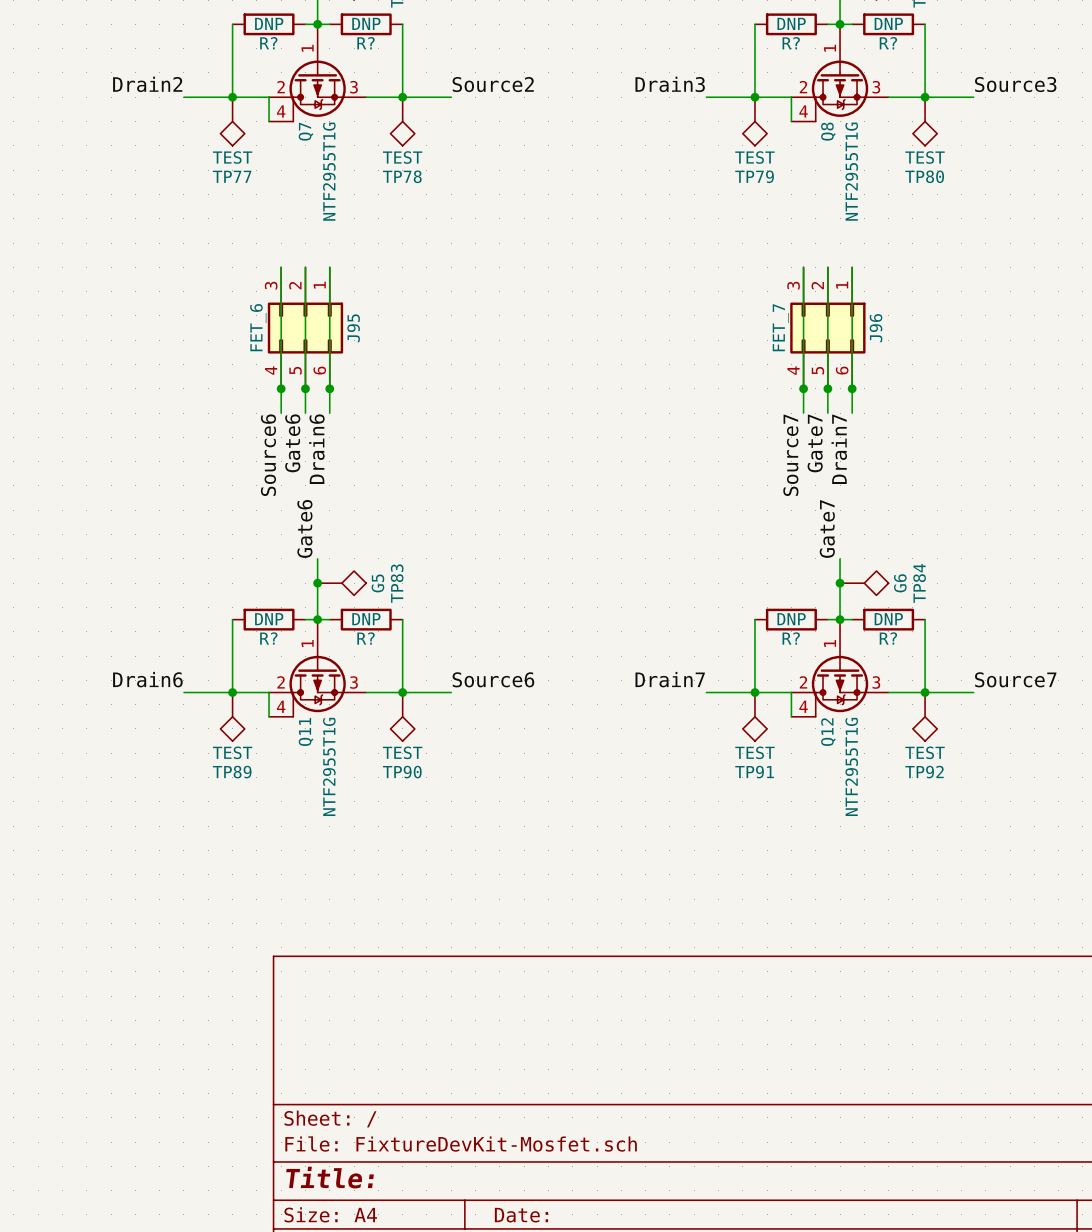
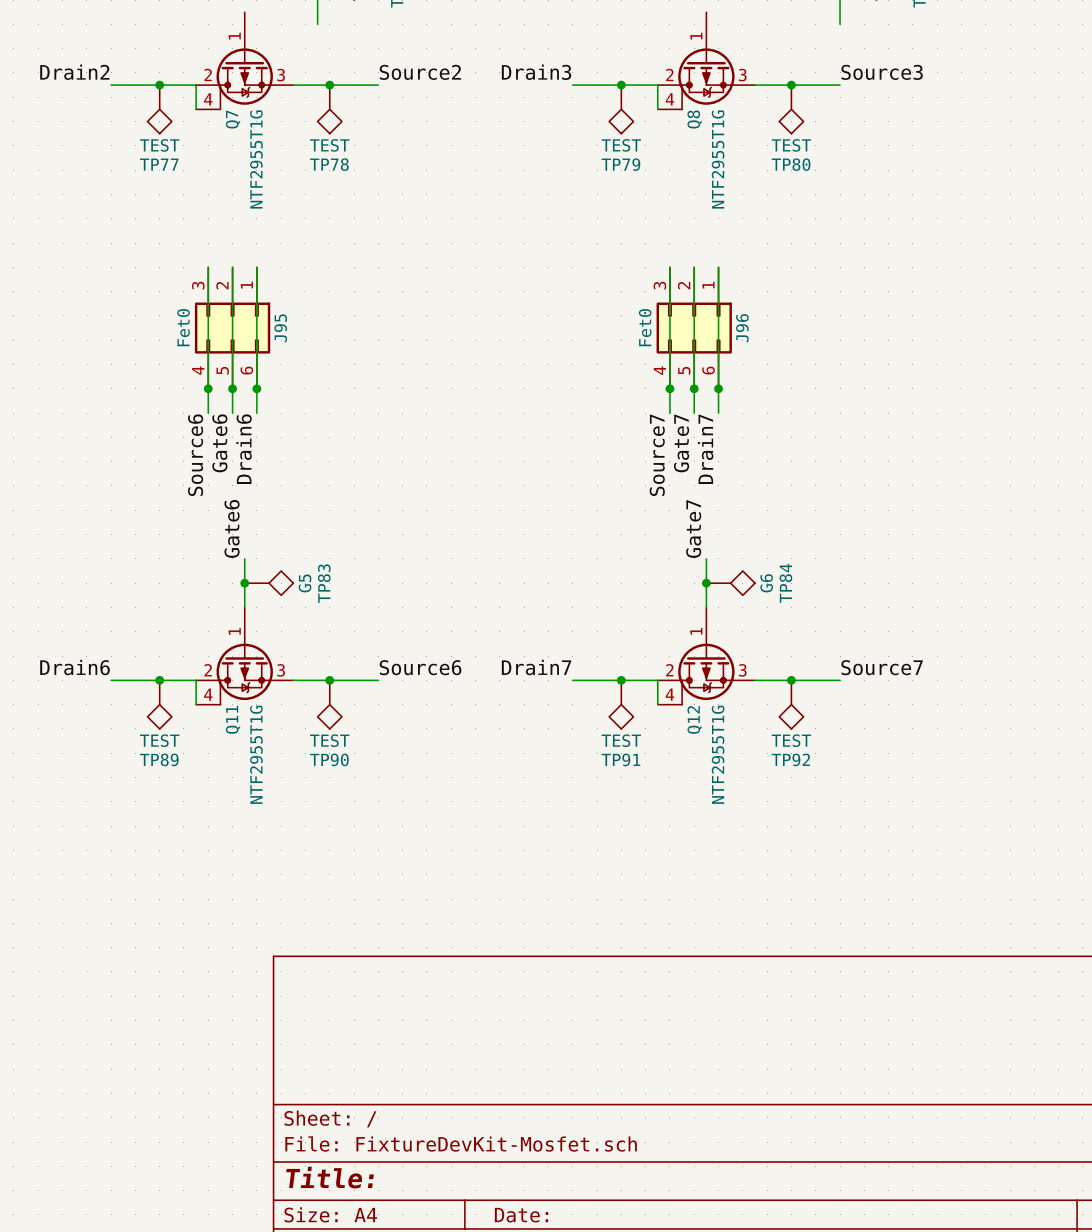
wire: (232, 24) (232, 97) -> none
R?: DNP (269, 24) -> none
wire: (305, 24) (329, 24) -> none
junction: (317, 24) -> none
R?: DNP (366, 24) -> none
wire: (402, 24) (402, 97) -> none
wire: (754, 24) (754, 97) -> none
R?: DNP (791, 24) -> none
wire: (827, 24) (852, 24) -> none
junction: (840, 24) -> none
R?: DNP (888, 24) -> none
wire: (925, 24) (925, 97) -> none
Q7 position: (317, 72) -> (244, 60)
Q8 position: (840, 72) -> (706, 60)
label position: Drain2 (147, 84) -> Drain2 (74, 72)
label position: Source2 (493, 84) -> Source2 (420, 72)
label position: Drain3 (670, 84) -> Drain3 (536, 72)
label position: Source3 (1015, 84) -> Source3 (882, 72)
junction: none -> (159, 85)
junction: none -> (329, 85)
junction: none -> (621, 85)
wire: (183, 97) (269, 97) (269, 121) -> (111, 85) (196, 85) (196, 109)
junction: (232, 97) -> none
wire: (366, 97) (451, 97) -> (293, 85) (378, 85)
junction: (402, 97) -> none
wire: (706, 97) (791, 97) (791, 121) -> (572, 85) (657, 85) (657, 109)
junction position: (754, 97) -> (791, 85)
wire: (888, 97) (973, 97) -> (754, 85) (840, 85)
junction: (925, 97) -> none
TP77 position: (232, 121) -> (159, 109)
TP78 position: (402, 121) -> (329, 109)
TP79 position: (754, 121) -> (621, 109)
TP80 position: (925, 121) -> (791, 109)
wire: (281, 267) (281, 413) -> (208, 267) (208, 413)
wire: (305, 267) (305, 413) -> (232, 267) (232, 413)
wire: (329, 267) (329, 413) -> (256, 267) (256, 413)
wire: (803, 267) (803, 413) -> (669, 267) (669, 413)
wire: (827, 267) (827, 413) -> (694, 267) (694, 413)
wire: (852, 267) (852, 413) -> (718, 267) (718, 413)
J95 value: FET_6 (258, 327) -> Fet0 (183, 327)
J96 value: FET_7 (780, 327) -> Fet0 (645, 327)
J95 position: (305, 328) -> (232, 328)
J96 position: (827, 328) -> (694, 328)
junction: none -> (208, 388)
junction: none -> (232, 388)
junction: none -> (256, 388)
junction: (281, 388) -> none
junction: (305, 388) -> none
junction: (329, 388) -> none
junction: none -> (669, 388)
junction: none -> (694, 388)
junction: none -> (718, 388)
junction: (803, 388) -> none
junction: (827, 388) -> none
junction: (852, 388) -> none
label position: Gate6 (292, 443) -> Gate6 (219, 443)
label: none -> Gate7 (681, 443)
label: Gate7 (815, 443) -> none
label position: Drain6 (316, 449) -> Drain6 (243, 449)
label position: Drain7 (839, 449) -> Drain7 (705, 449)
label position: Source6 (268, 455) -> Source6 (195, 455)
label: none -> Source7 (657, 455)
label: Source7 (790, 455) -> none
label position: Gate6 (304, 528) -> Gate6 (232, 528)
label: none -> Gate7 (693, 529)
label: Gate7 (827, 529) -> none
wire: none -> (244, 558) (244, 607)
wire: (317, 558) (317, 619) -> none
wire: none -> (706, 558) (706, 607)
wire: (840, 558) (840, 619) -> none
junction: none -> (244, 583)
junction: (317, 583) -> none
TP83 position: (341, 583) -> (269, 583)
junction: none -> (706, 583)
junction: (840, 583) -> none
TP84 position: (864, 583) -> (730, 583)
wire: (232, 619) (232, 692) -> none
R?: DNP (269, 619) -> none
wire: (305, 619) (329, 619) -> none
junction: (317, 619) -> none
R?: DNP (366, 619) -> none
wire: (402, 619) (402, 692) -> none
wire: (754, 619) (754, 692) -> none
R?: DNP (791, 619) -> none
wire: (827, 619) (852, 619) -> none
junction: (840, 619) -> none
R?: DNP (888, 619) -> none
wire: (925, 619) (925, 692) -> none
label: none -> Source7 (882, 667)
Q11 position: (317, 668) -> (244, 656)
Q12 position: (840, 668) -> (706, 656)
label position: Drain6 (147, 679) -> Drain6 (74, 667)
label position: Source6 (493, 679) -> Source6 (420, 667)
label position: Drain7 (670, 679) -> Drain7 (536, 667)
label: Source7 (1015, 679) -> none
junction: none -> (159, 680)
junction: none -> (329, 680)
junction: none -> (621, 680)
wire: (183, 692) (269, 692) (269, 716) -> (111, 680) (196, 680) (196, 704)
junction: (232, 692) -> none
wire: (366, 692) (451, 692) -> (293, 680) (378, 680)
junction: (402, 692) -> none
wire: (706, 692) (791, 692) (791, 716) -> (572, 680) (657, 680) (657, 704)
junction position: (754, 692) -> (791, 680)
wire: (888, 692) (973, 692) -> (754, 680) (840, 680)
junction: (925, 692) -> none
TP89 position: (232, 716) -> (159, 704)
TP90 position: (402, 716) -> (329, 704)
TP91 position: (754, 716) -> (621, 704)
TP92 position: (925, 716) -> (791, 704)

